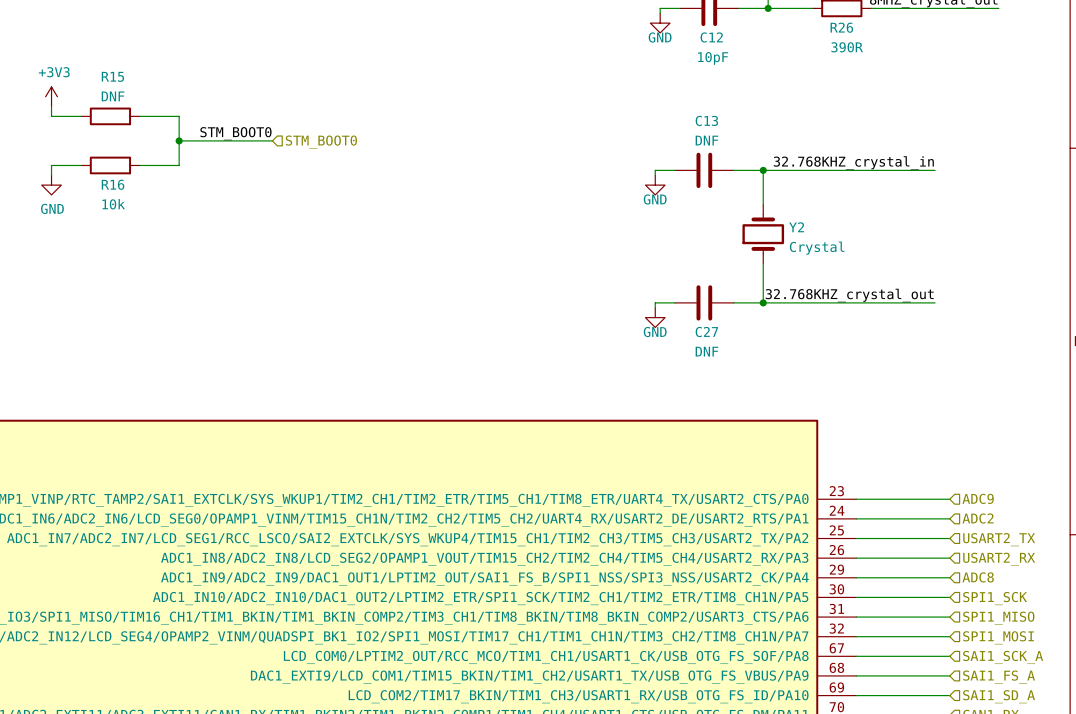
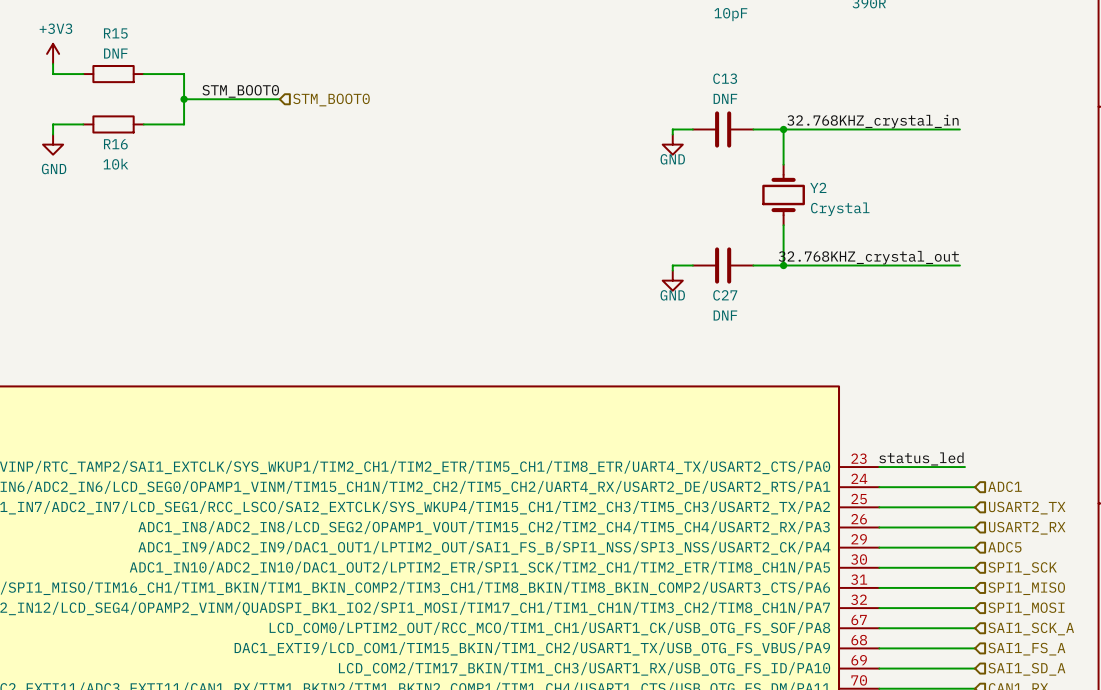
label: none -> status_led (921, 458)
hierarchical label: ADC9 (978, 498) -> none
wire: (939, 499) (949, 499) -> none
hierarchical label: ADC2 (978, 518) -> ADC1 (1005, 486)
hierarchical label: ADC8 (978, 577) -> ADC5 (1004, 547)

